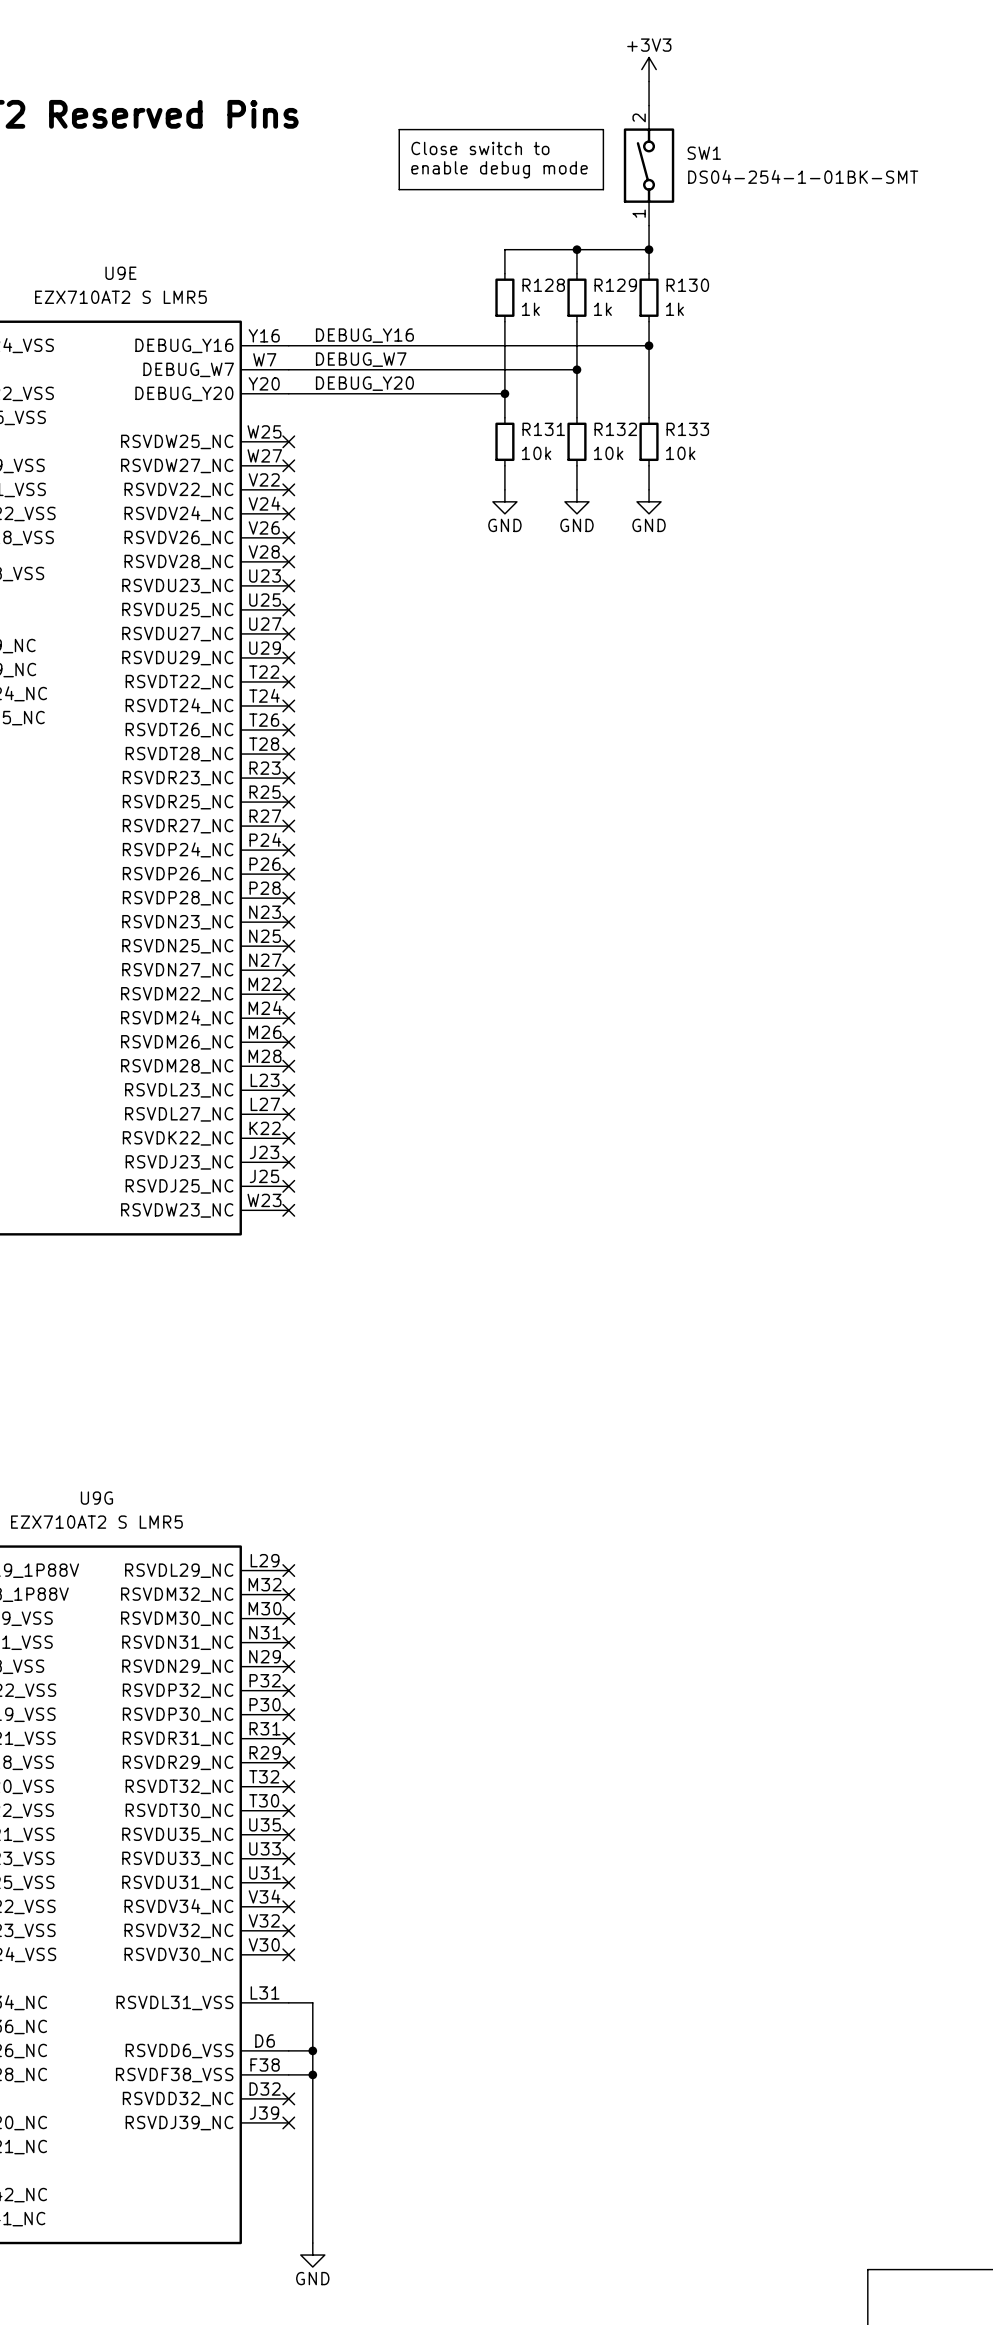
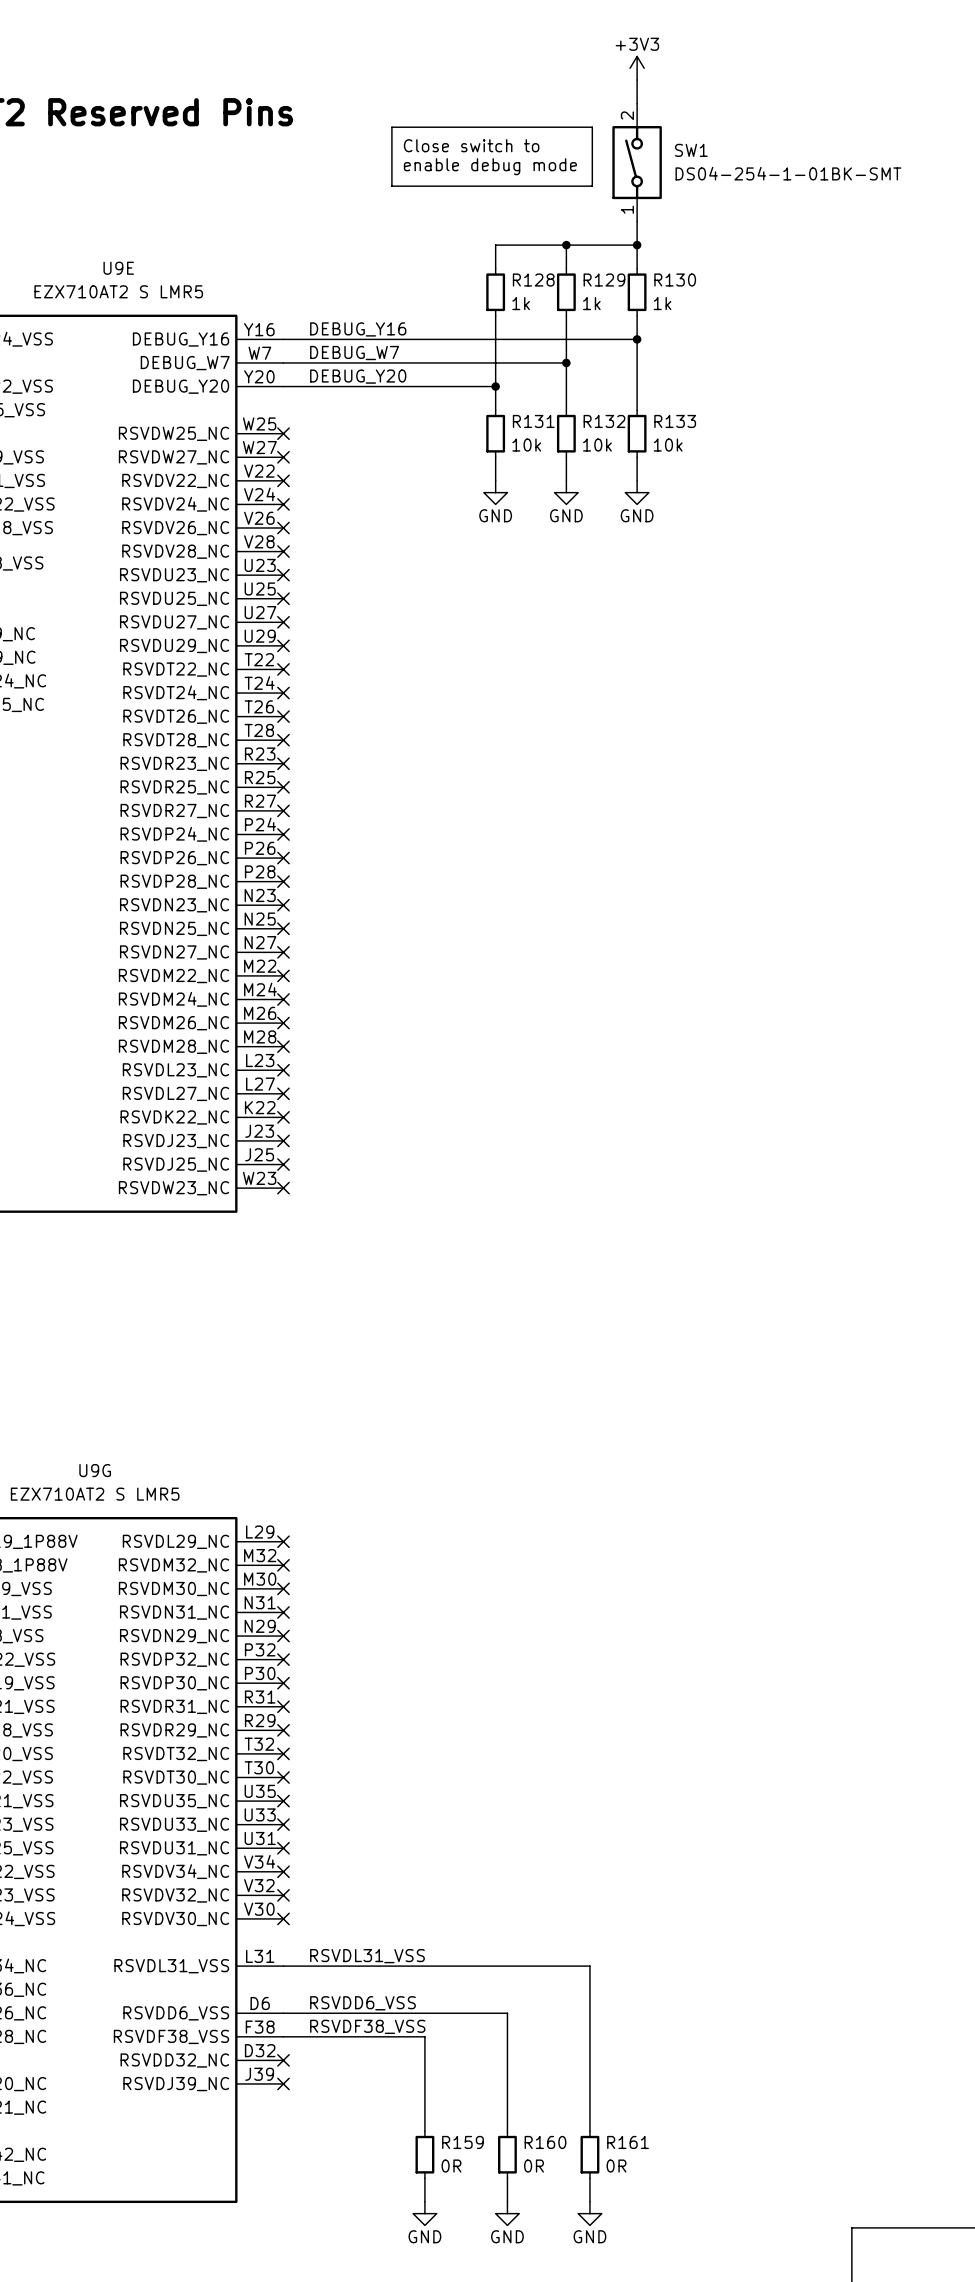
label: none -> RSVDL31_VSS (367, 1956)
wire: (312, 2002) (312, 2243) -> (307, 1966) (589, 1966) (589, 2131)
label: none -> RSVDD6_VSS (362, 2003)
wire: none -> (307, 2013) (507, 2013) (507, 2131)
junction: (312, 2050) -> none
label: none -> RSVDF38_VSS (367, 2026)
wire: none -> (307, 2036) (424, 2036) (424, 2131)
junction: (312, 2074) -> none
R159: none -> (424, 2154)
R160: none -> (507, 2154)
R161: none -> (589, 2154)
wire: none -> (424, 2178) (424, 2201)
wire: none -> (507, 2178) (507, 2201)
wire: none -> (589, 2178) (589, 2201)
power symbol: GND (312, 2255) -> none
power symbol: none -> GND (424, 2213)
power symbol: none -> GND (507, 2213)
power symbol: none -> GND (589, 2213)

